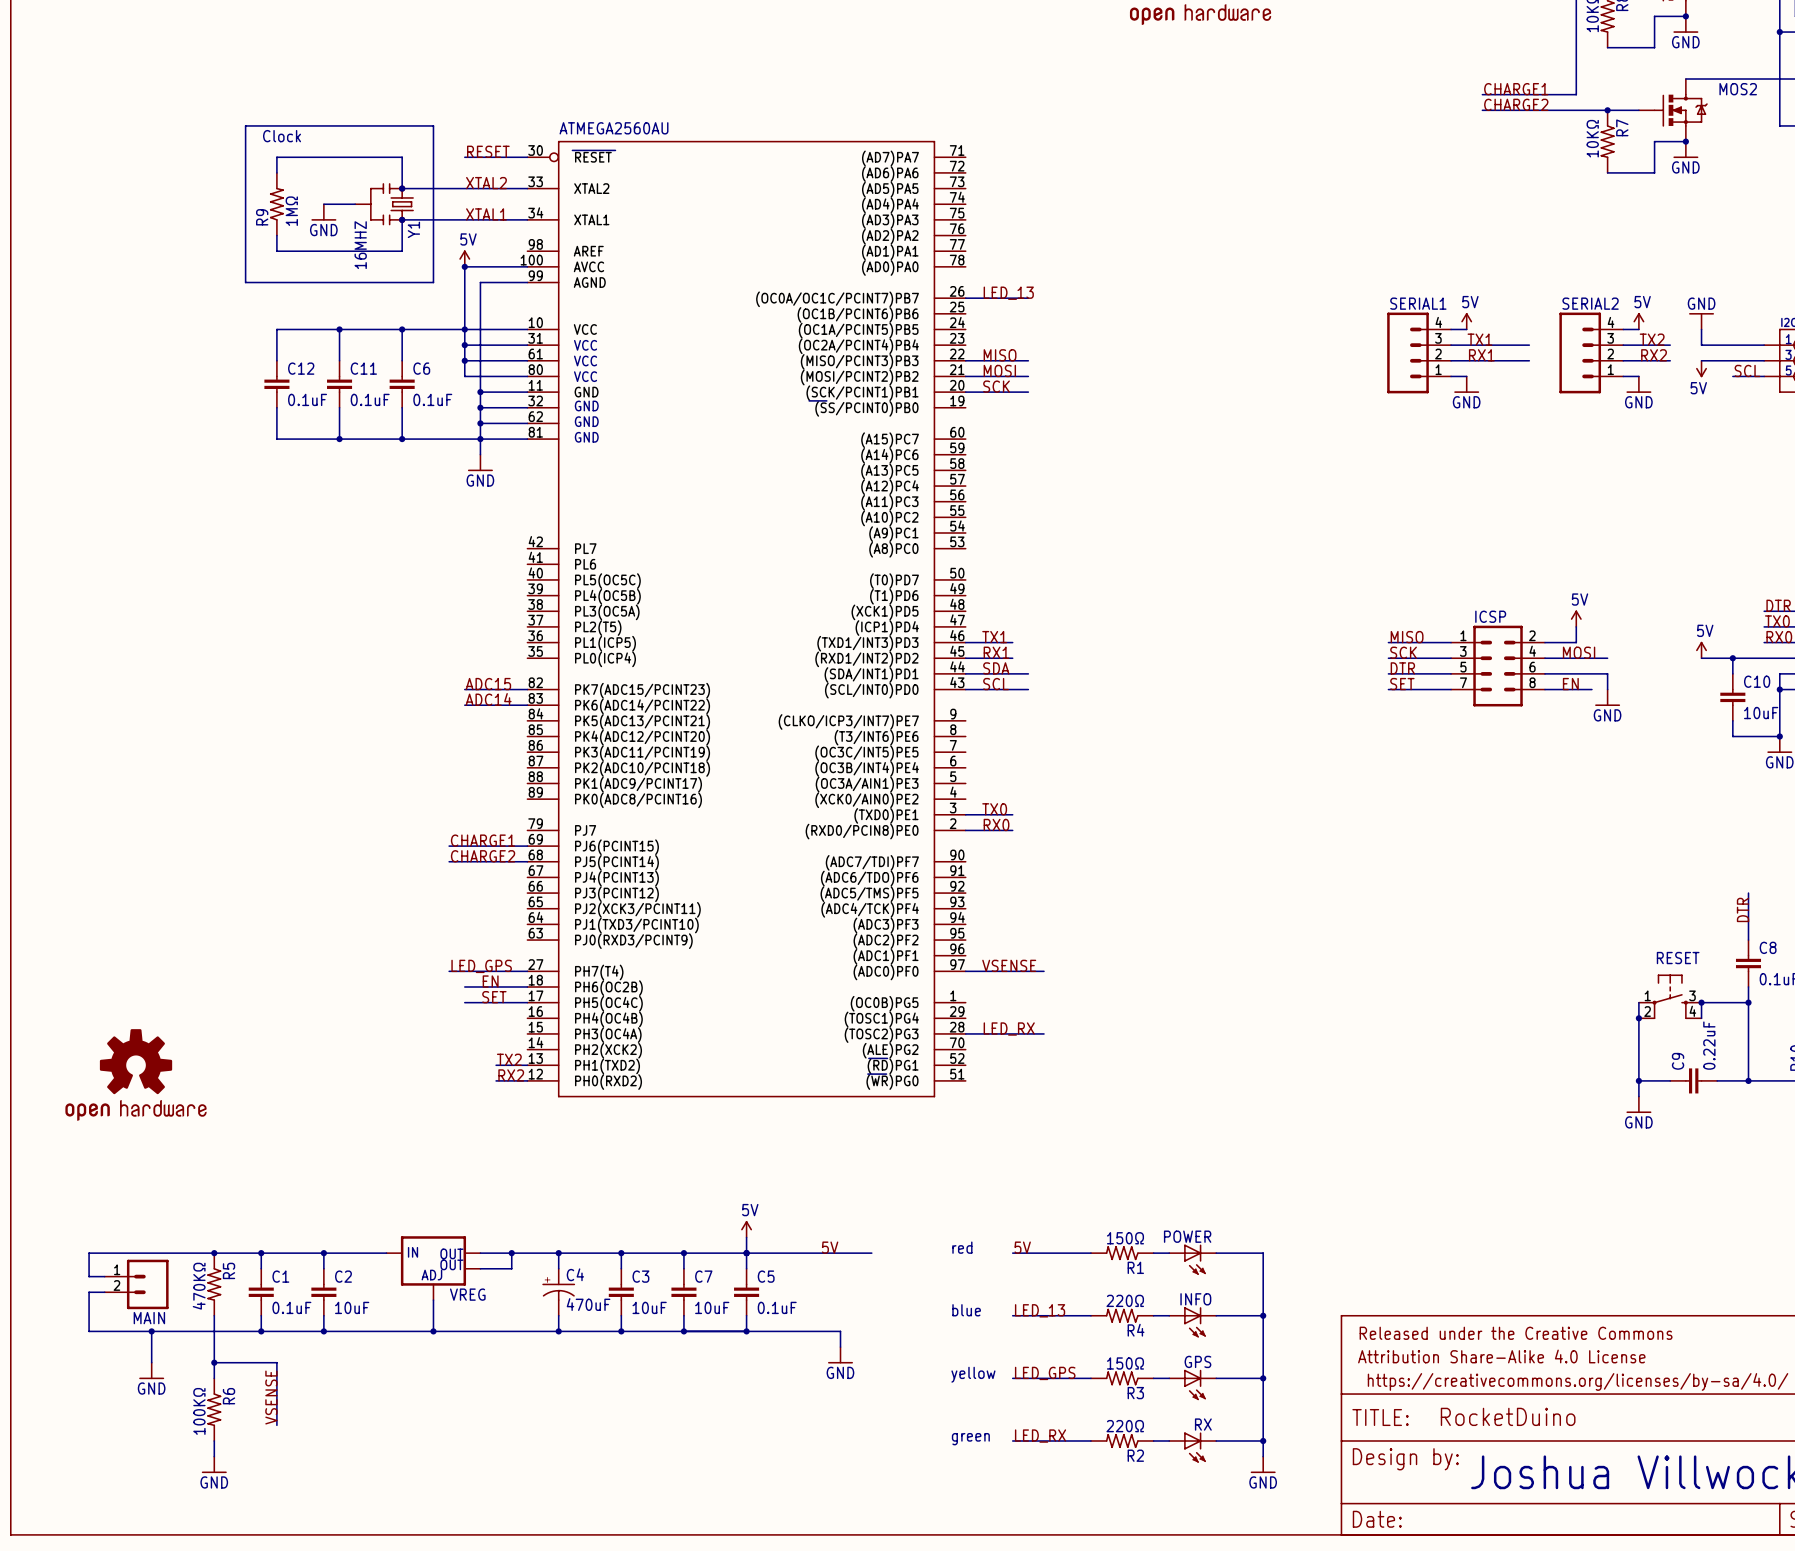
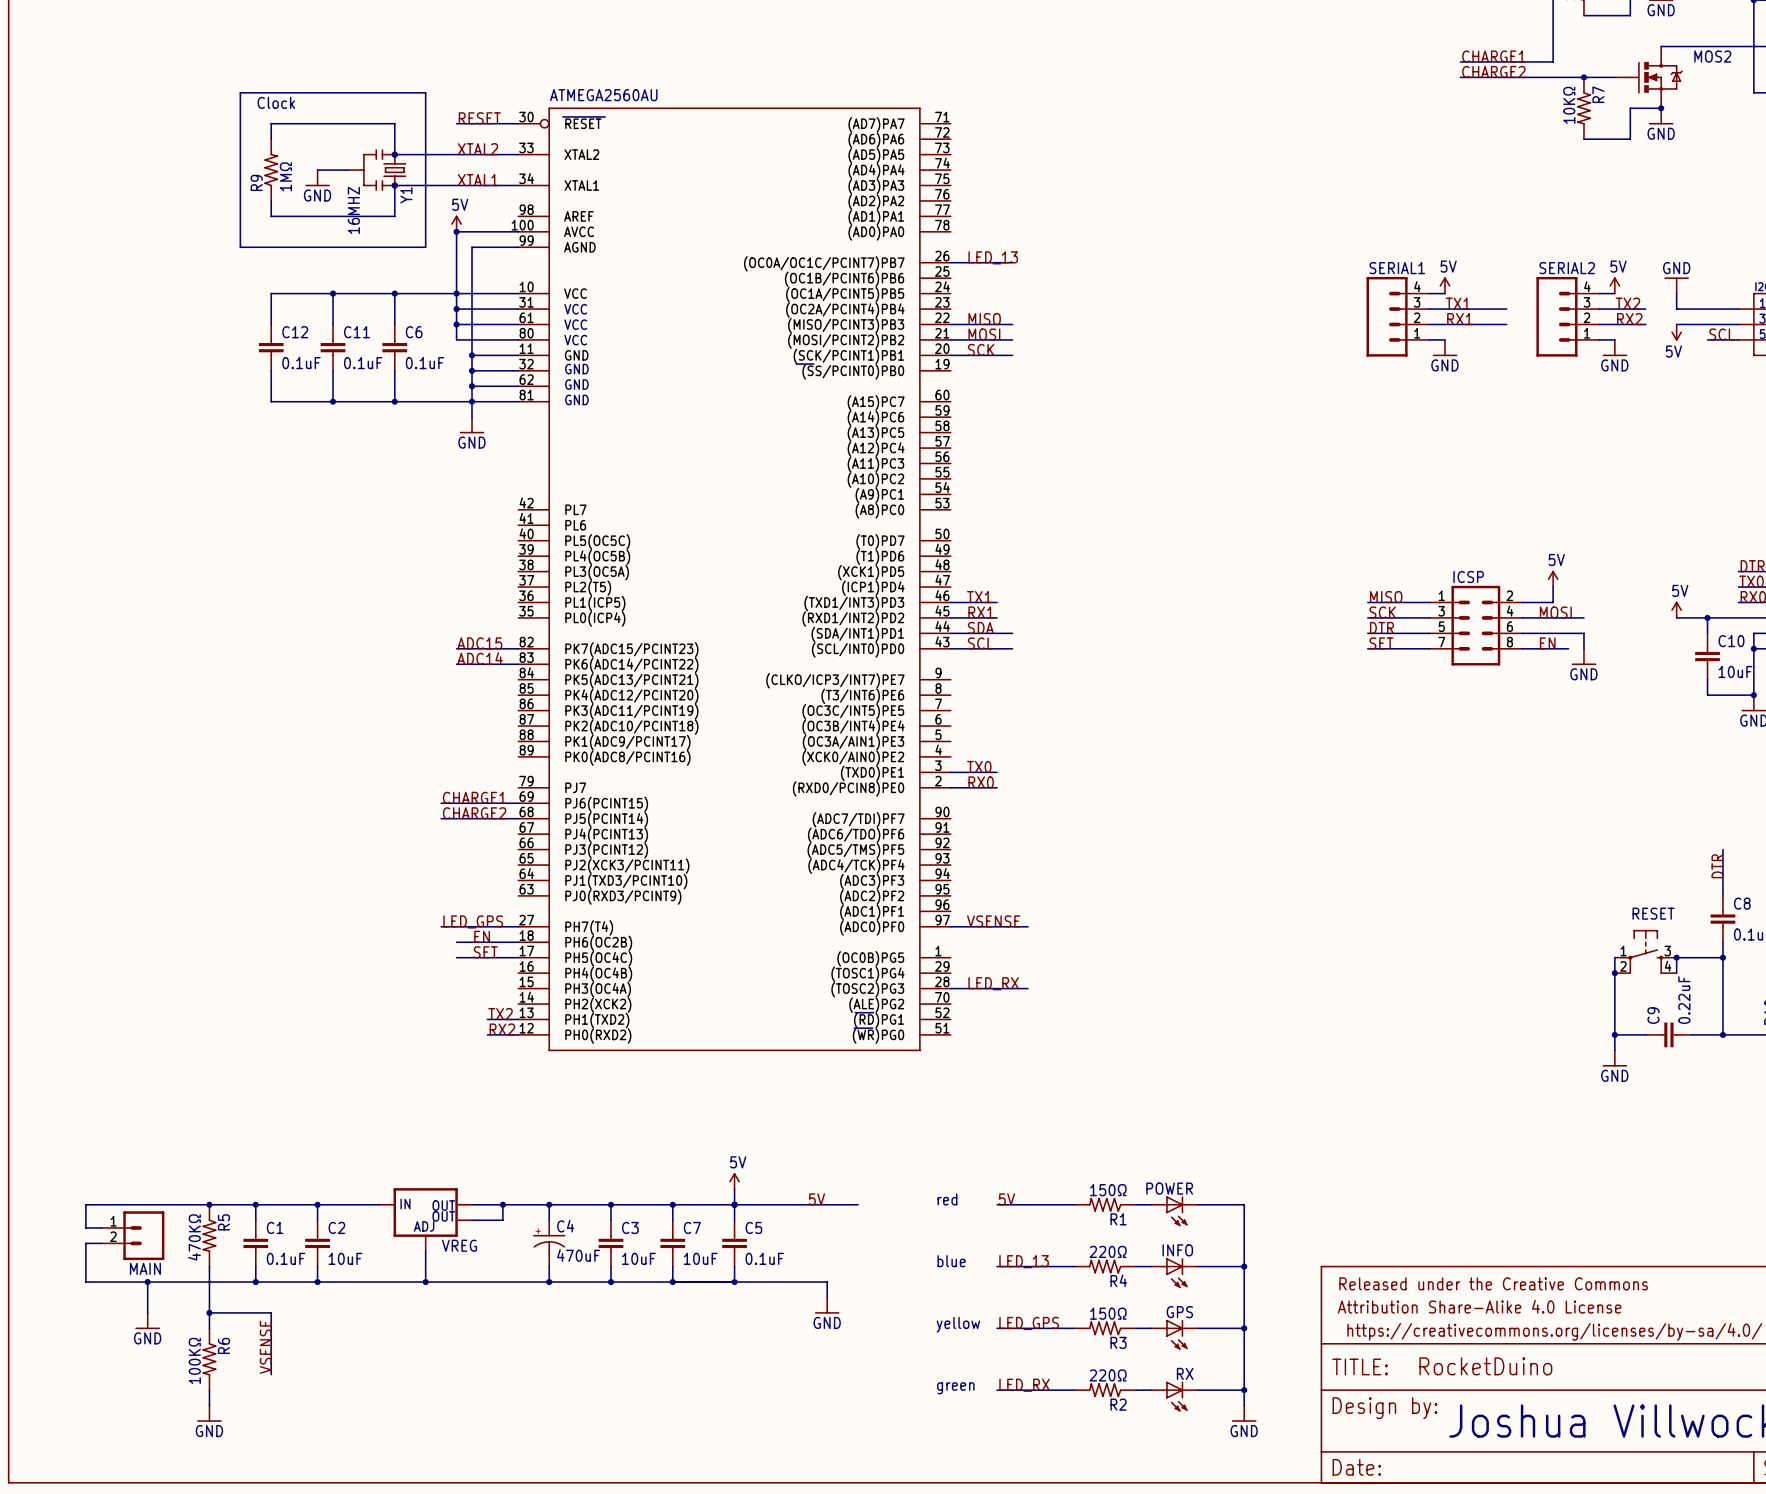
part: (135, 1074) -> none

